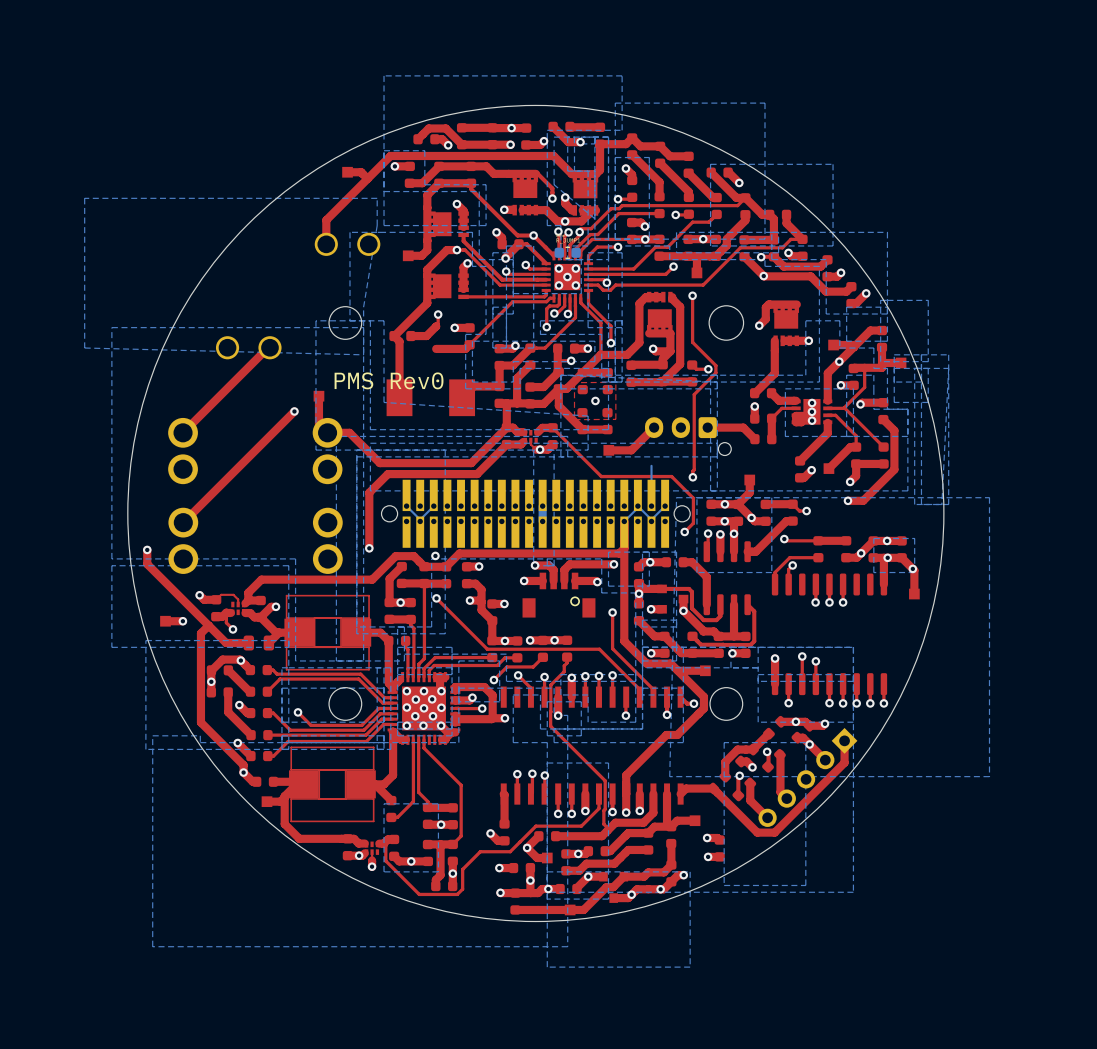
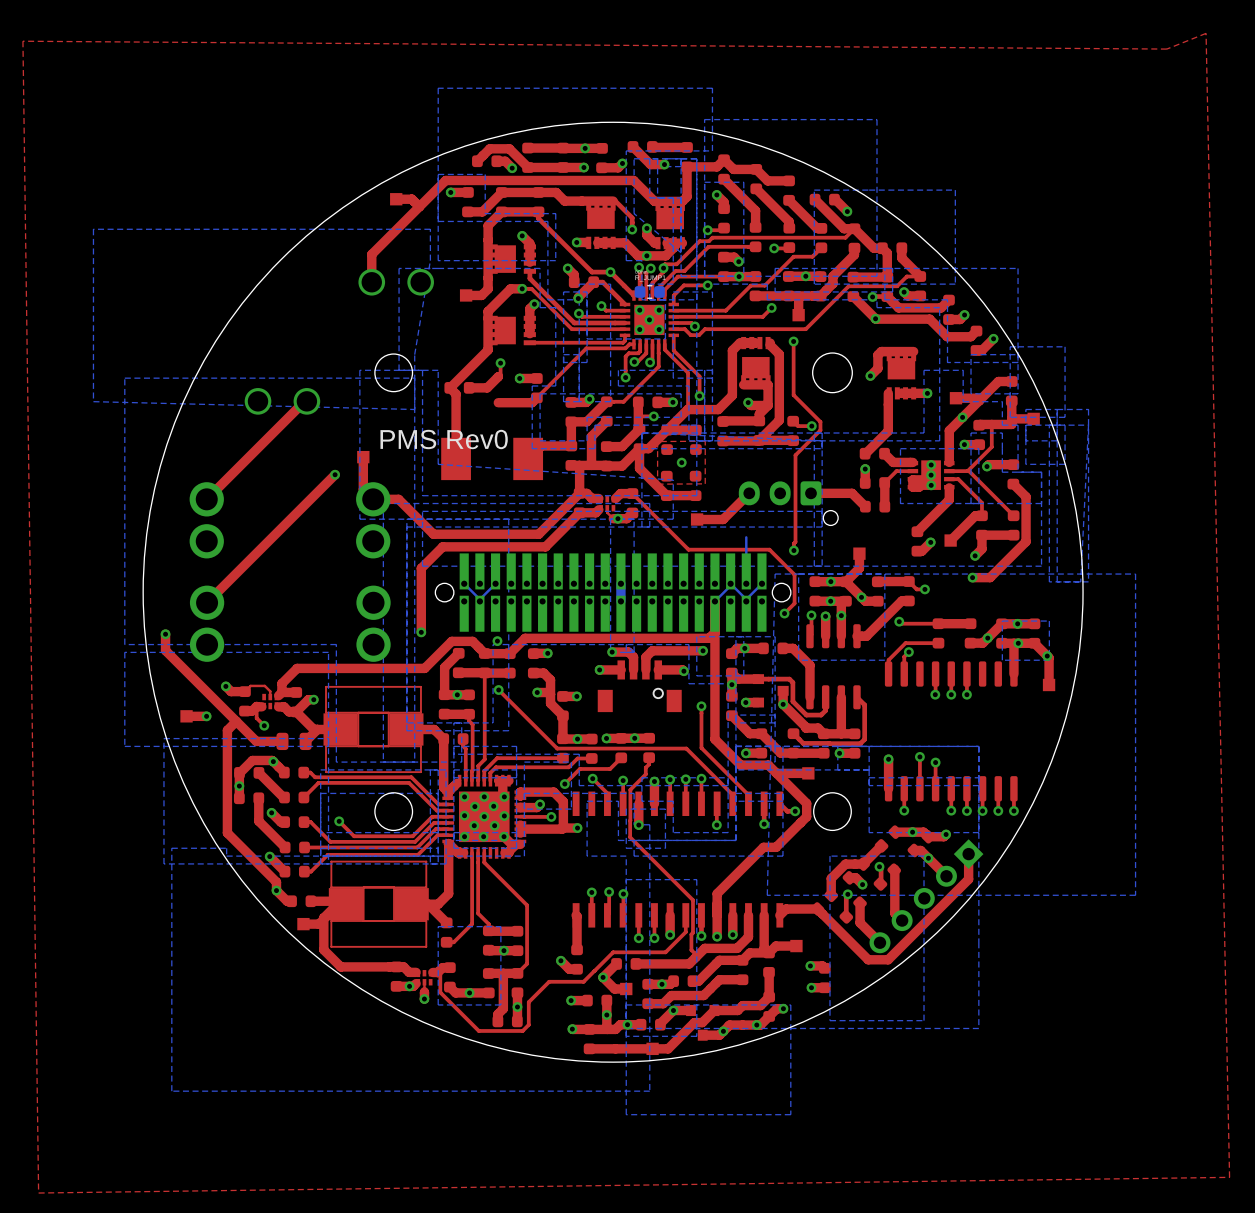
top zone outline: none -> (1206, 33) (1229, 1177) (38, 1193) (22, 41) (1166, 49) (1206, 33)

